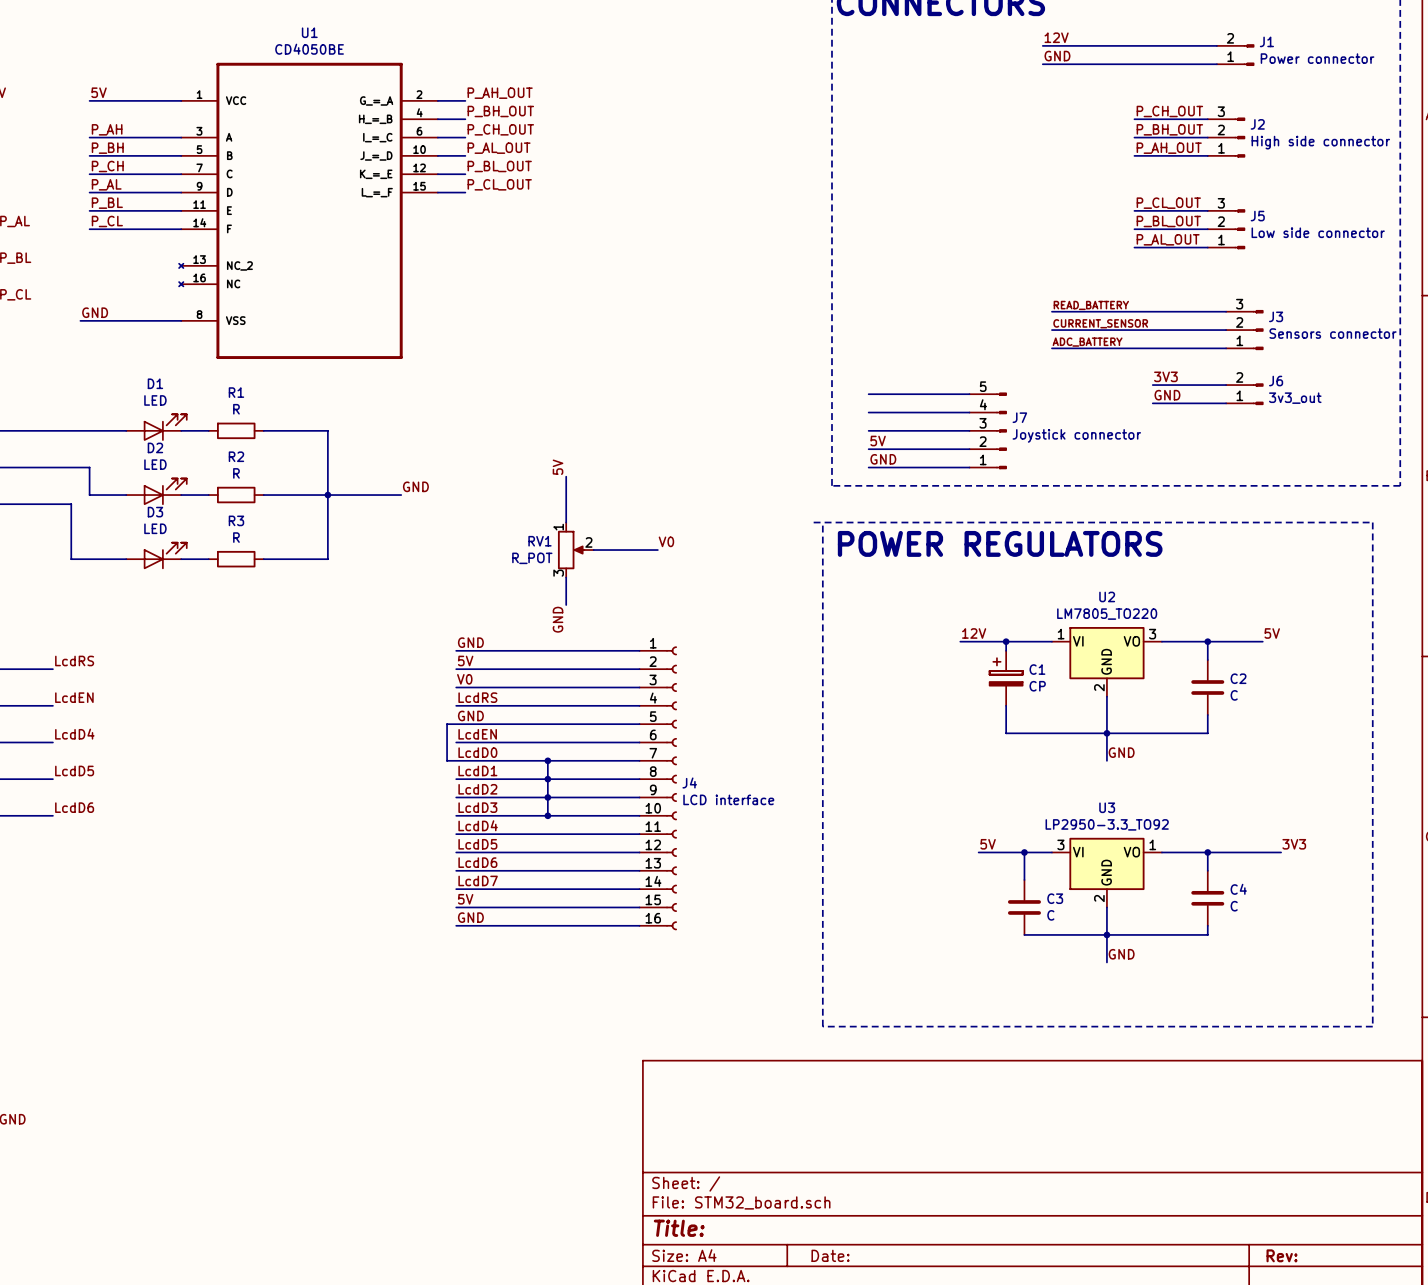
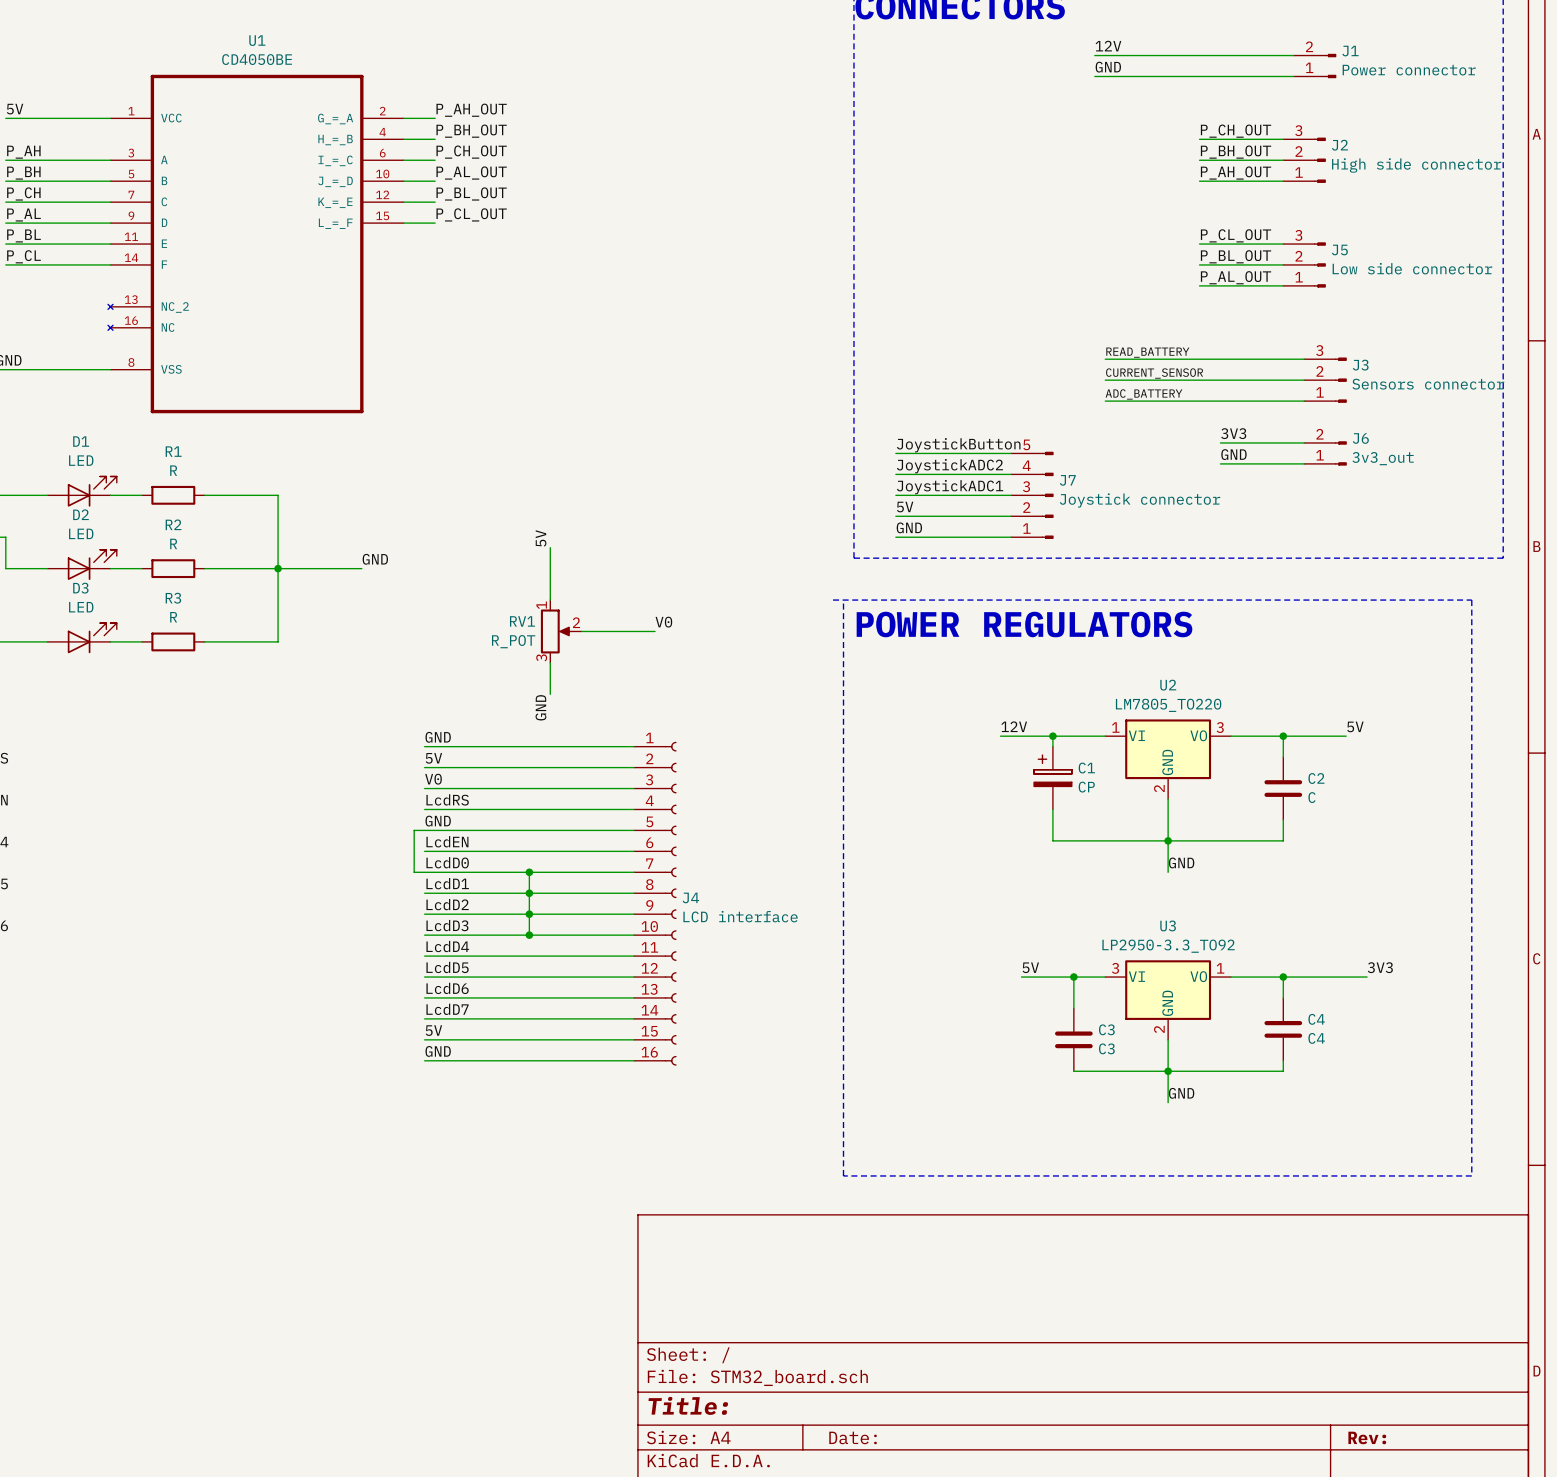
label: none -> JoystickButton (958, 445)
label: none -> JoystickADC2 (949, 466)
label: none -> JoystickADC1 (950, 487)
C4 value: C (1234, 906) -> C4 (1316, 1038)
C3 value: C (1050, 915) -> C3 (1106, 1048)

